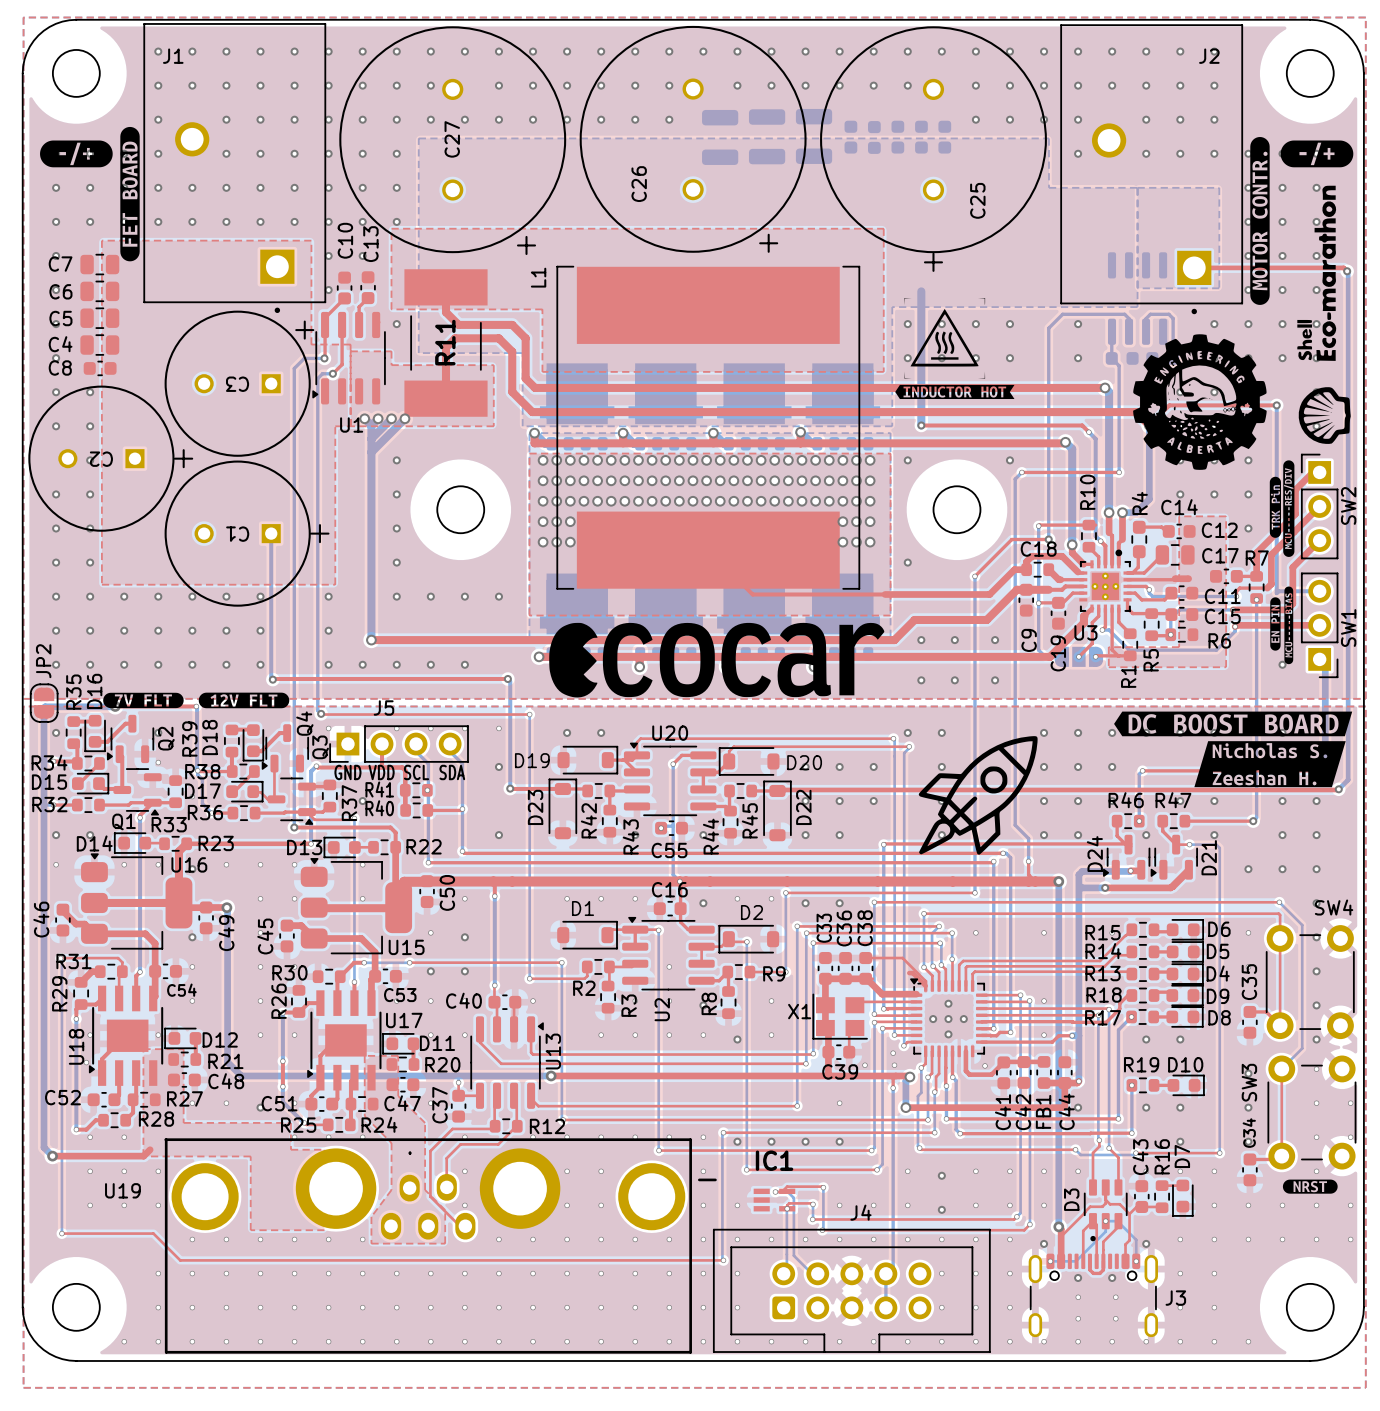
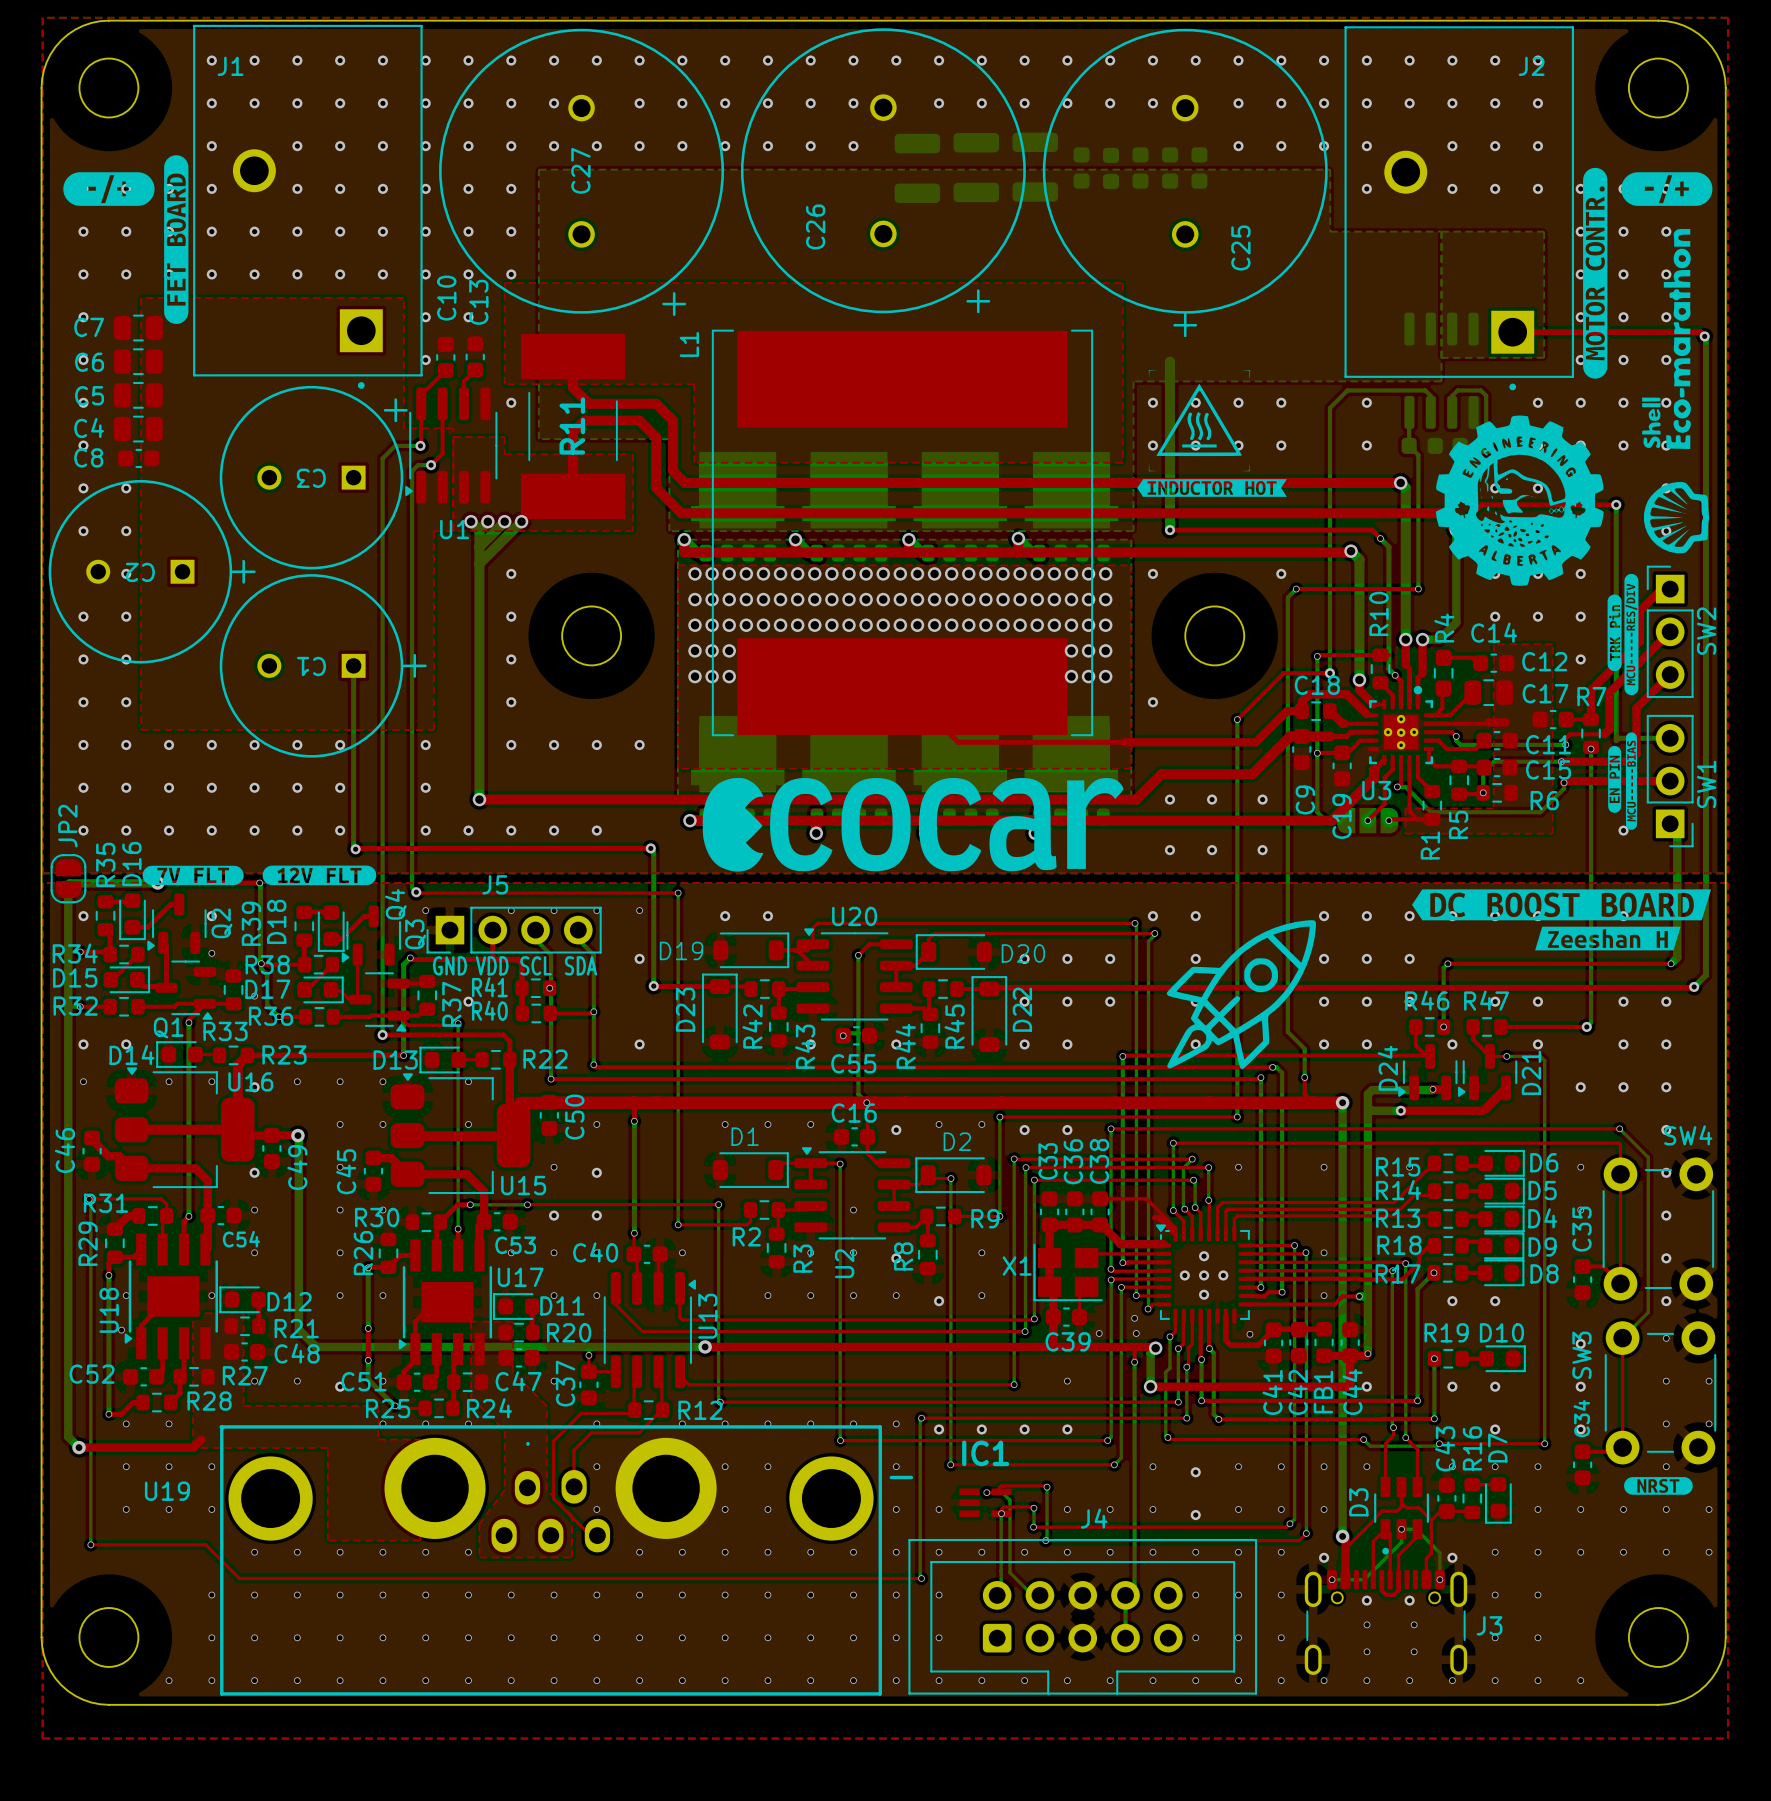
drawing shape: [1194, 741, 1346, 788] -> [1535, 926, 1681, 951]

